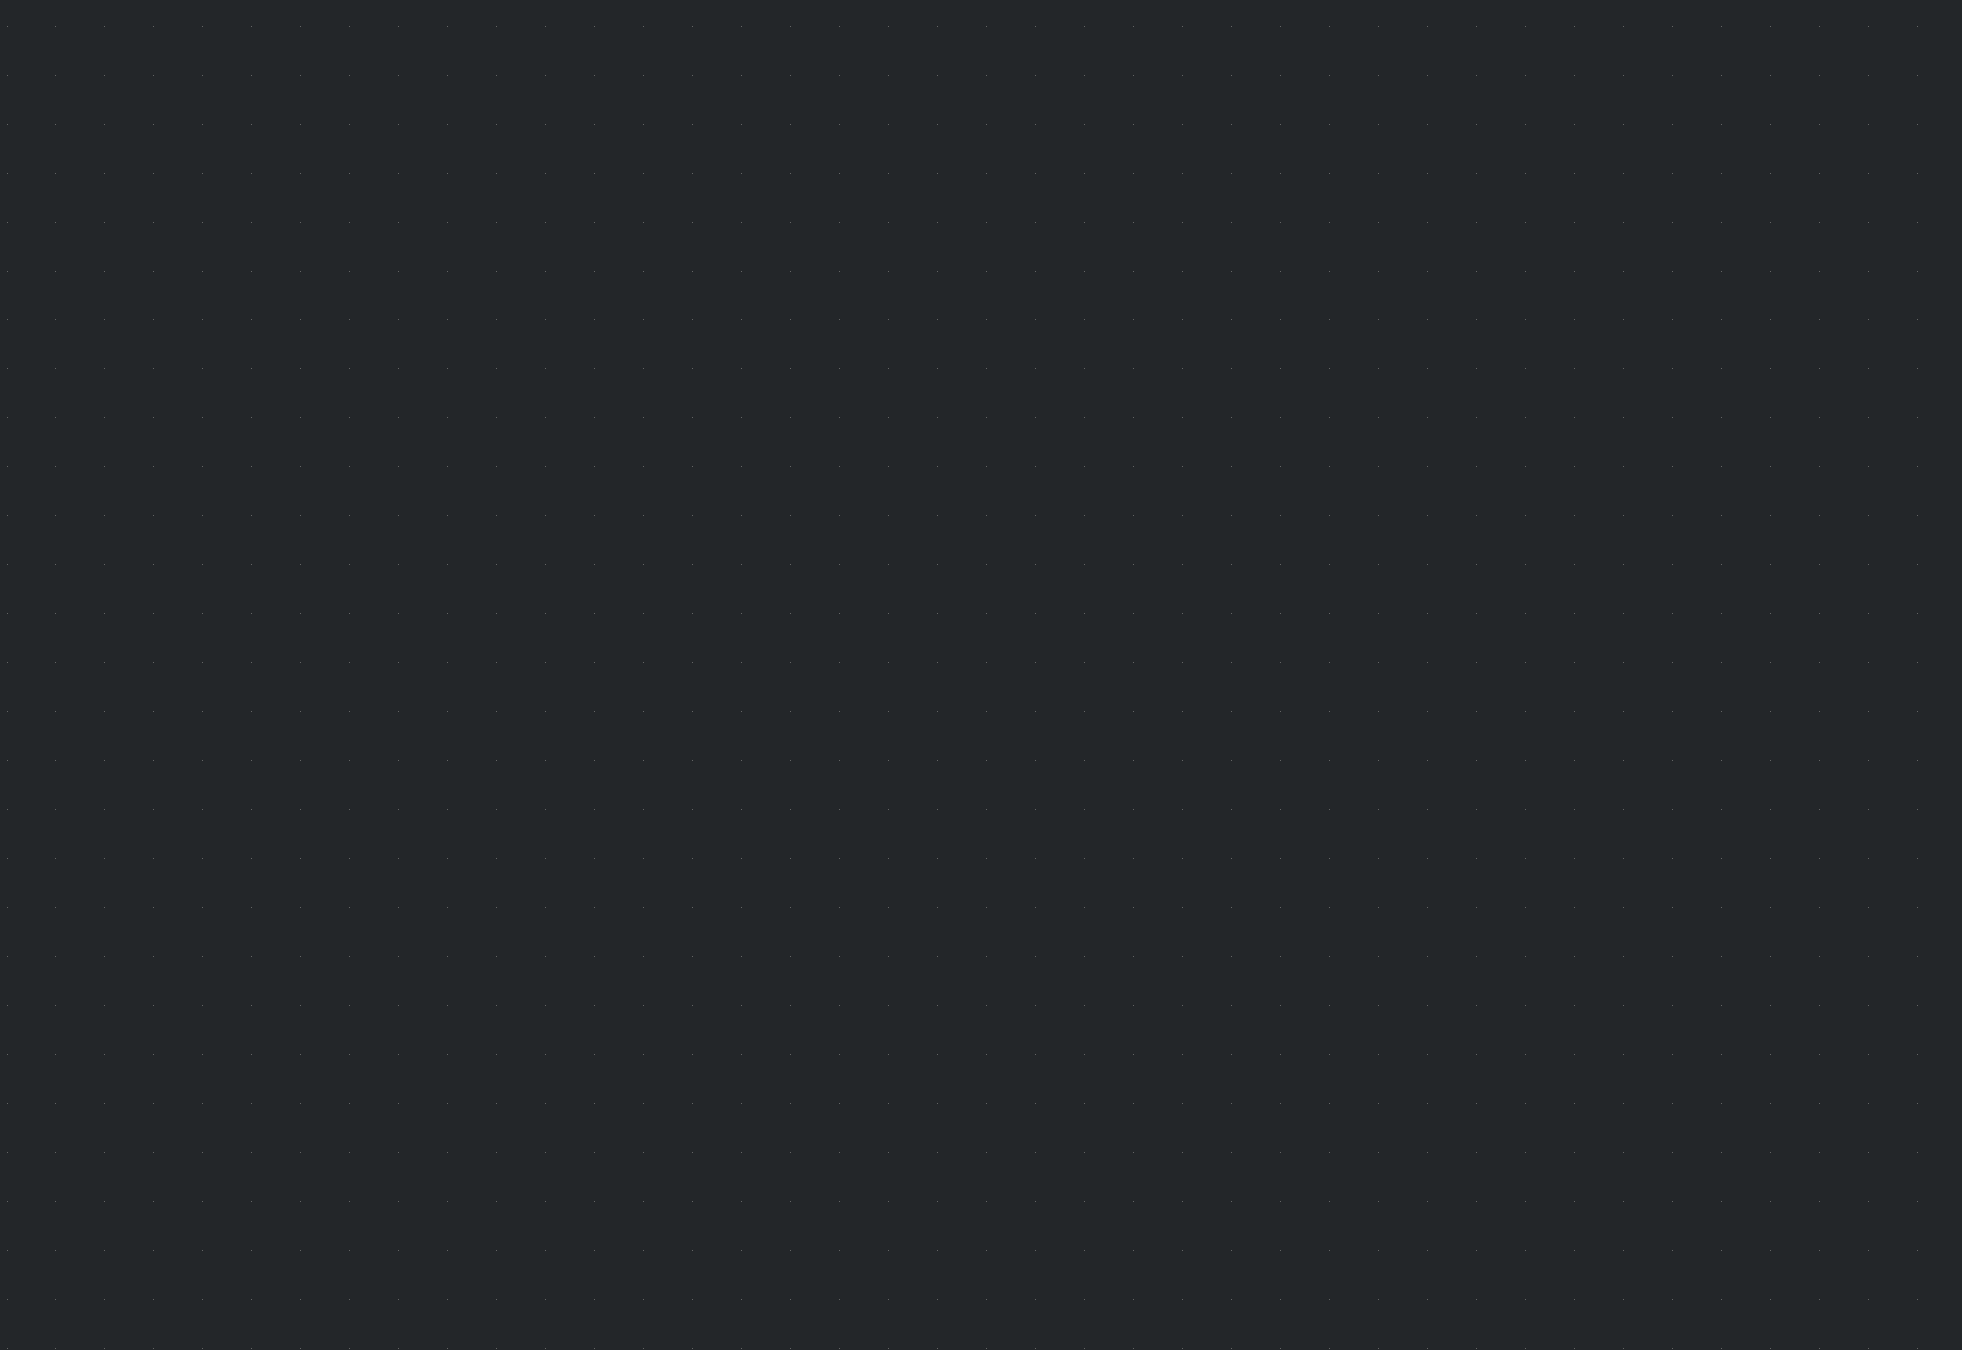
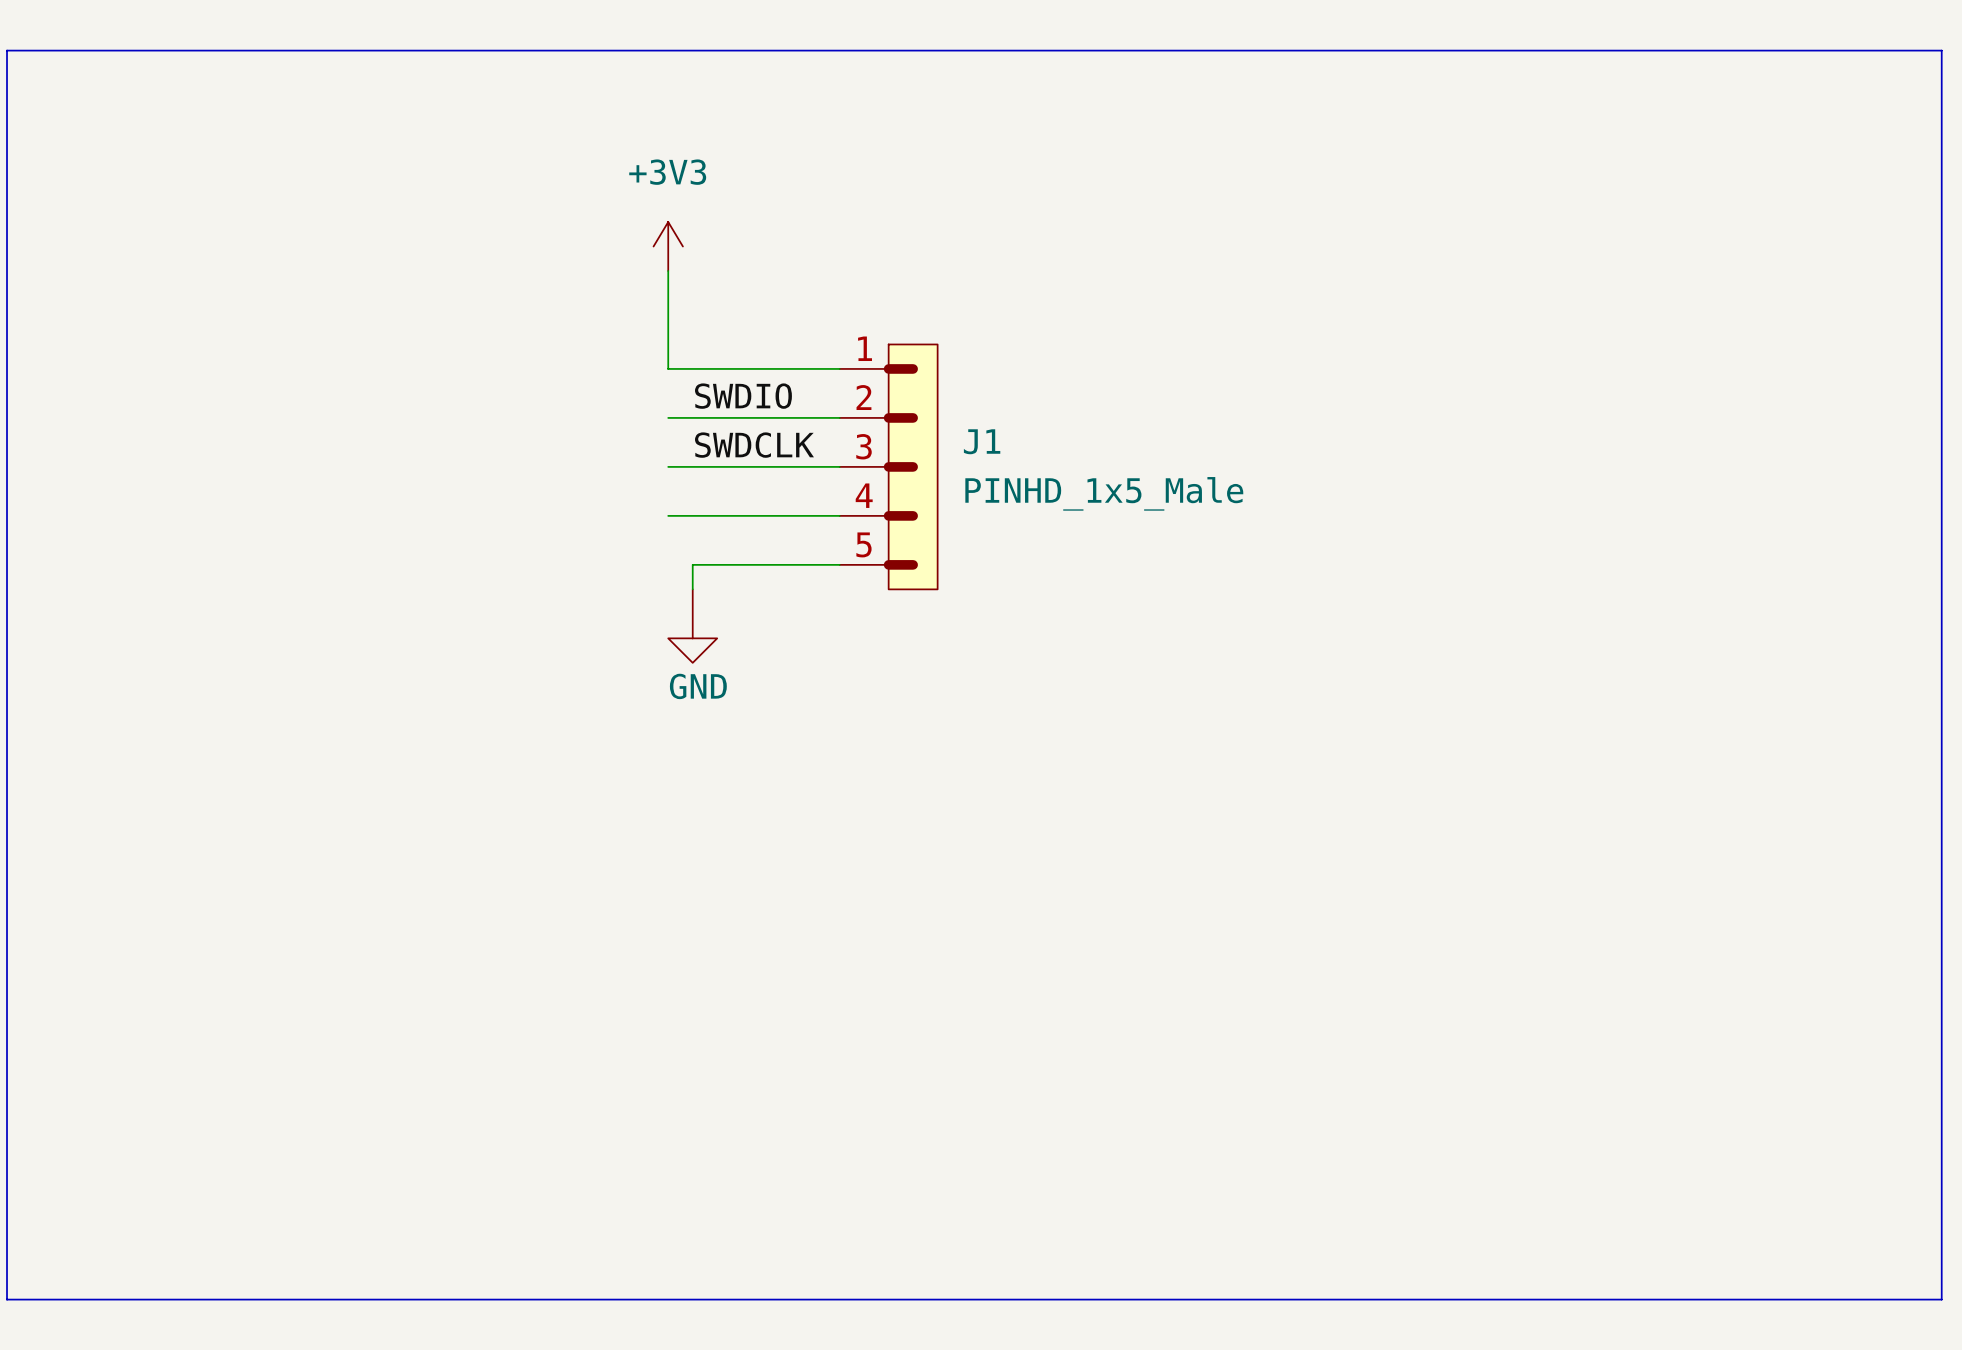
line: none -> (7, 50) (1941, 50) (1941, 1299) (7, 1299) (7, 50)
power symbol: none -> +3V3 (668, 246)
wire: none -> (668, 271) (668, 368) (839, 368)
label: none -> SWDIO (743, 396)
wire: none -> (668, 417) (839, 417)
label: none -> SWDCLK (754, 445)
wire: none -> (668, 466) (839, 466)
J1: none -> PINHD_1x5_Male (888, 466)
wire: none -> (668, 515) (839, 515)
wire: none -> (839, 564) (692, 564) (692, 589)
power symbol: none -> GND (692, 626)

